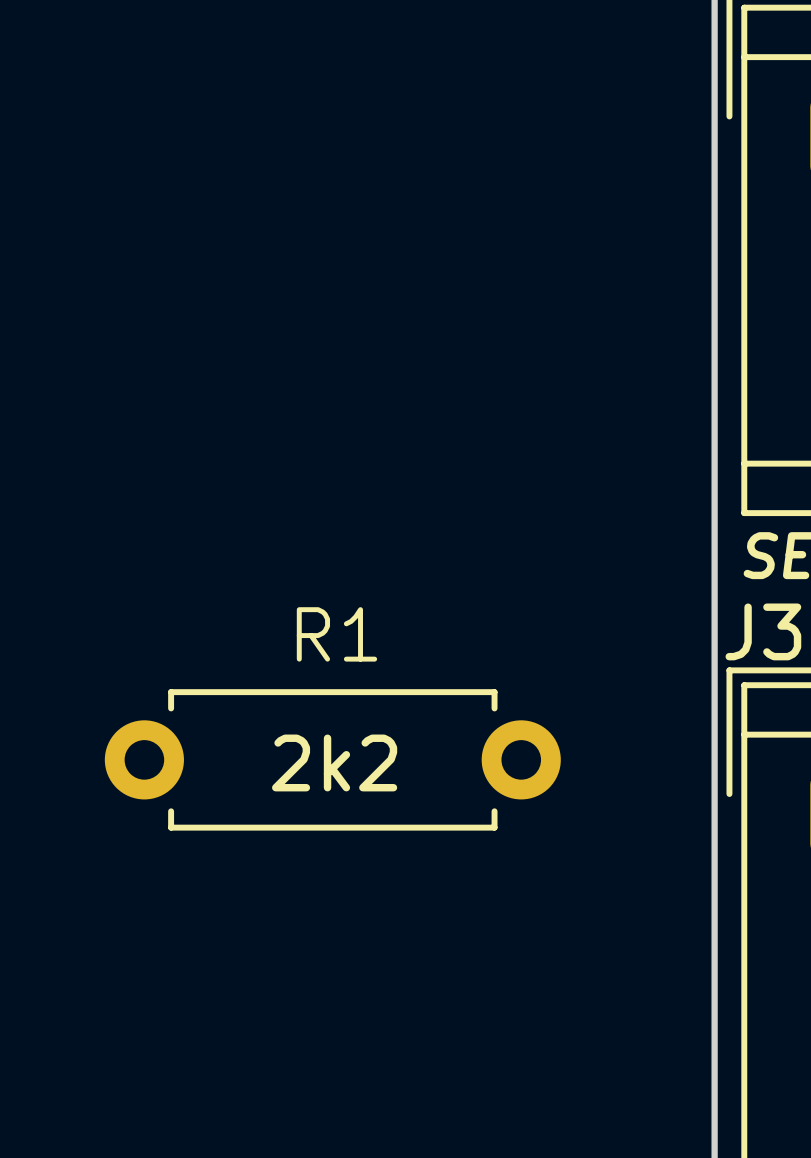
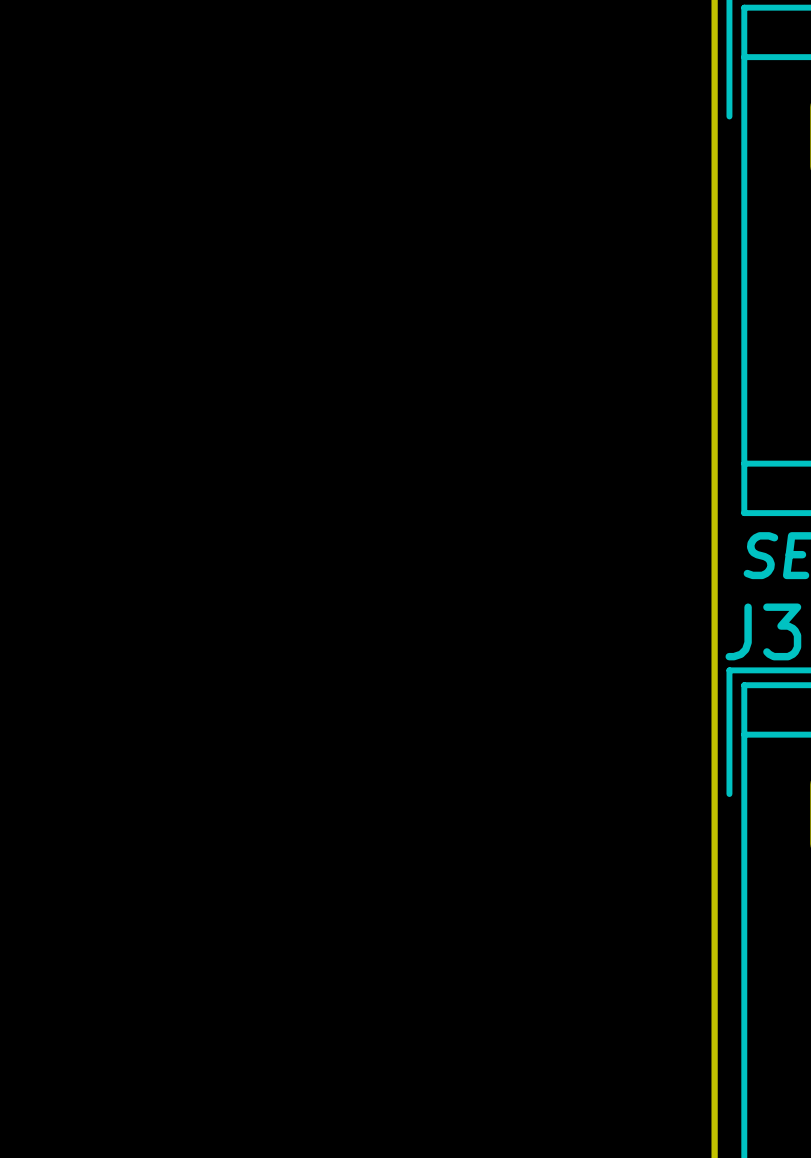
R1: 2k2 (332, 759) -> none

